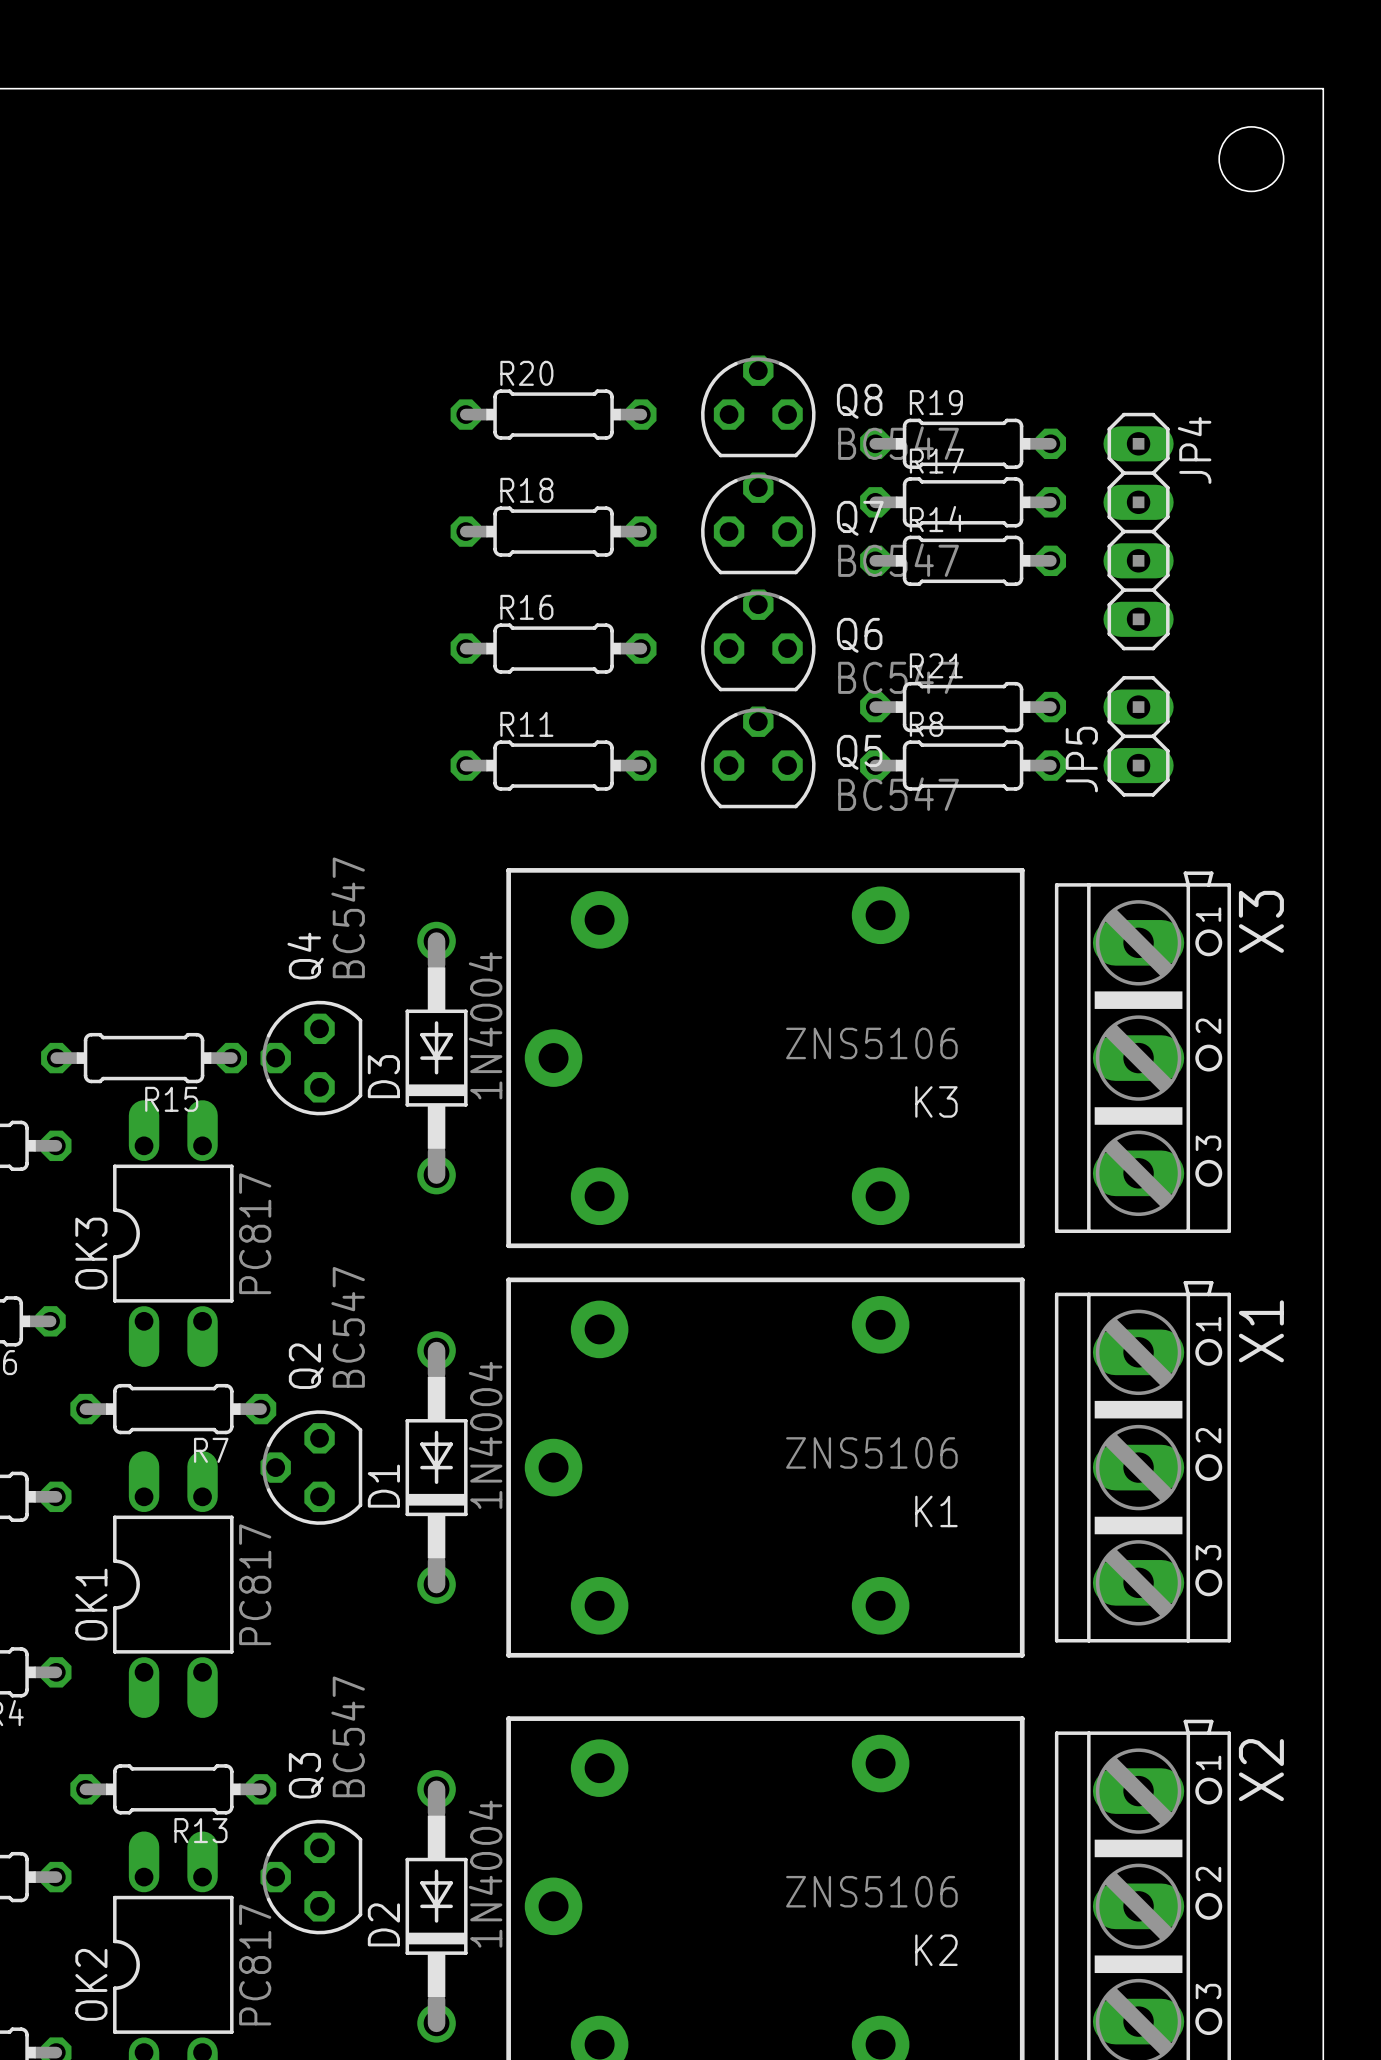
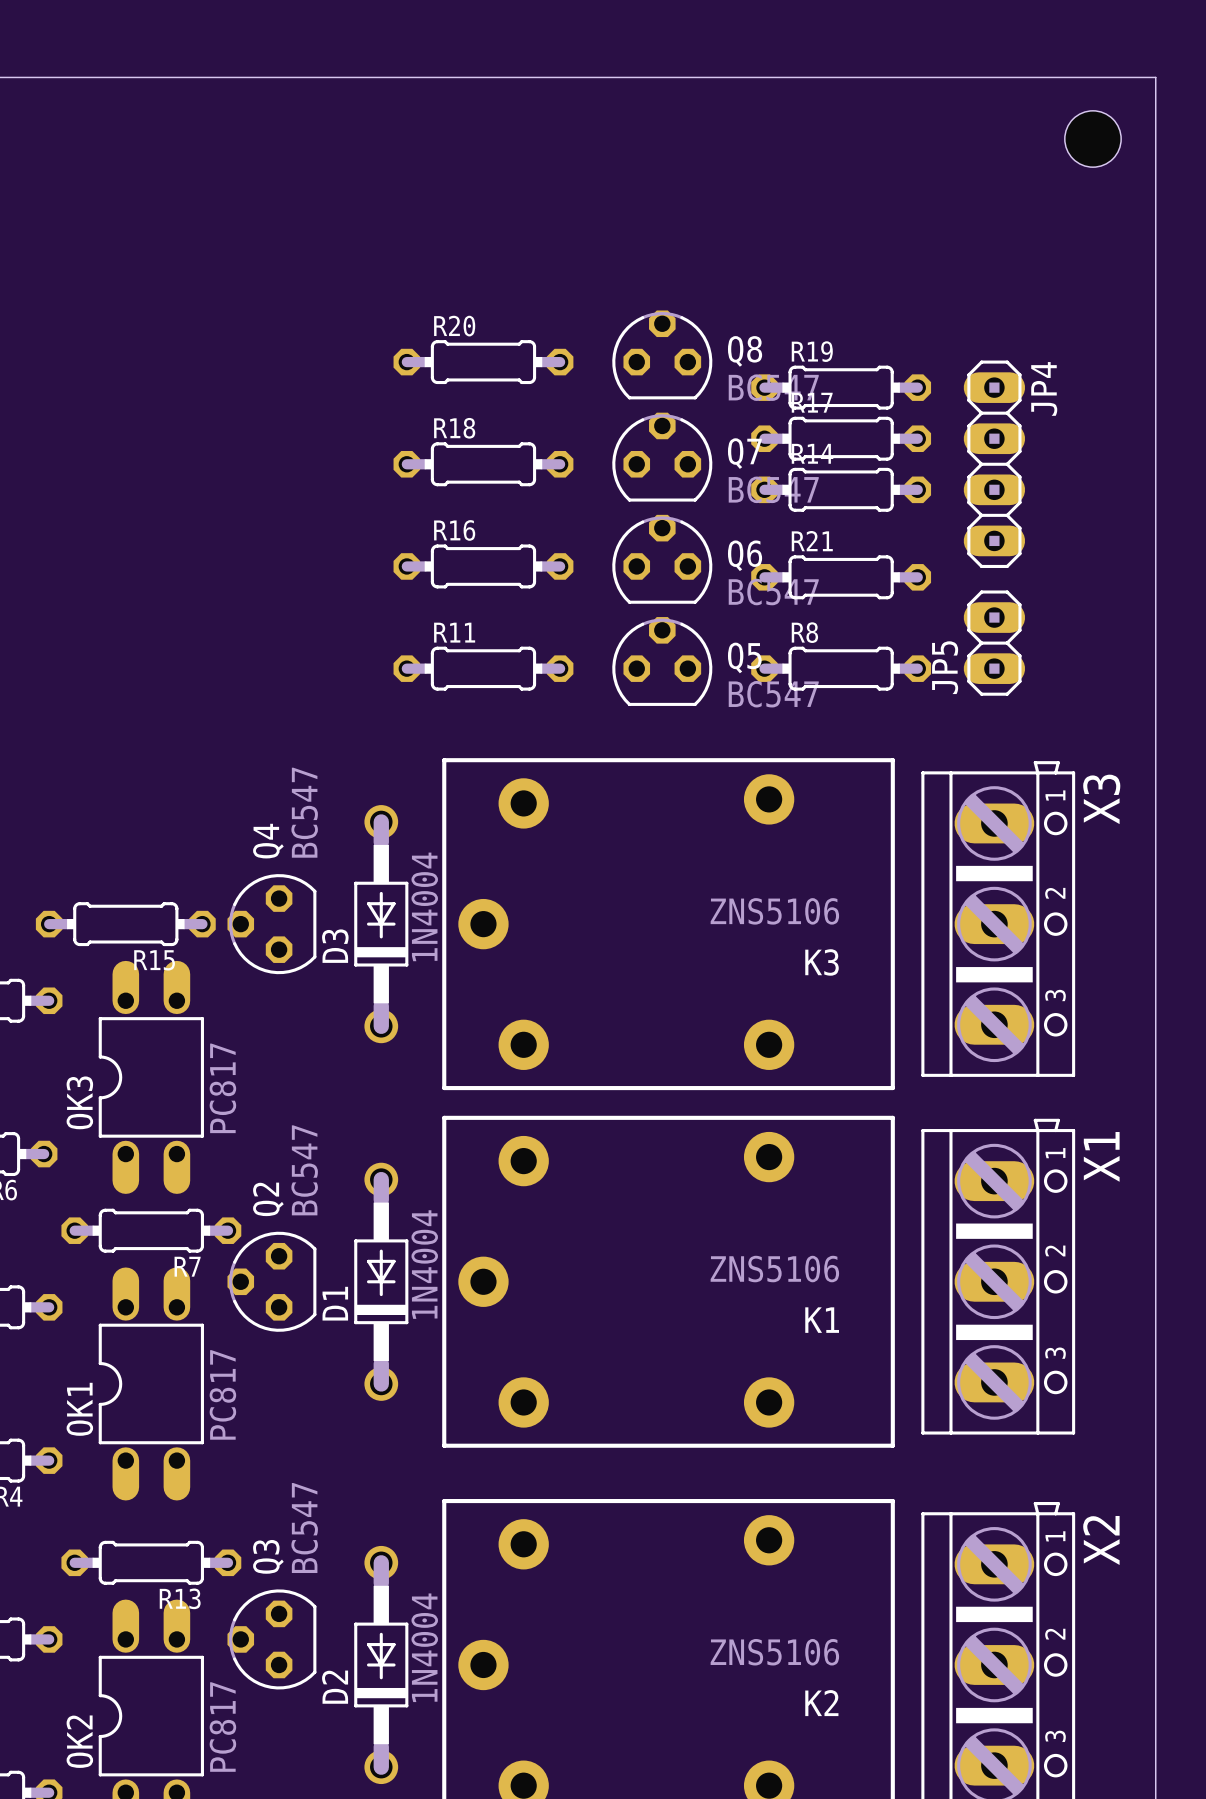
R21 position: (963, 707) -> (841, 577)

